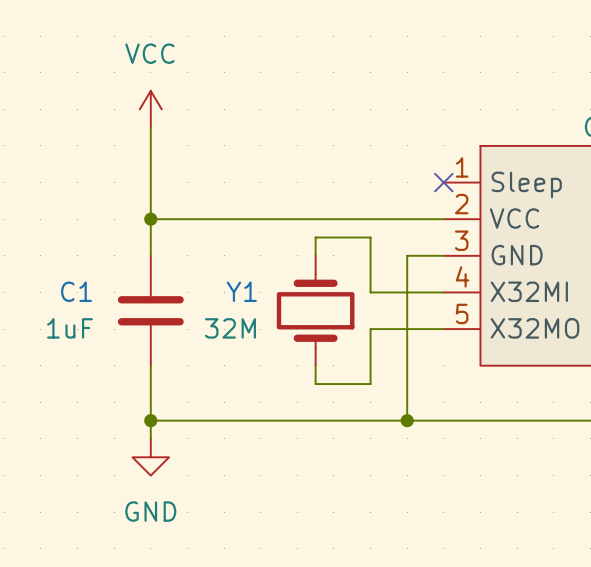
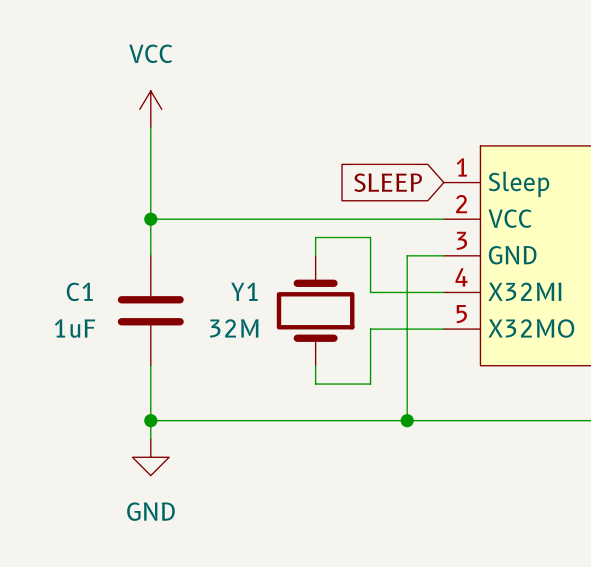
global label: none -> SLEEP (388, 182)
no-connect mark: (443, 182) -> none

